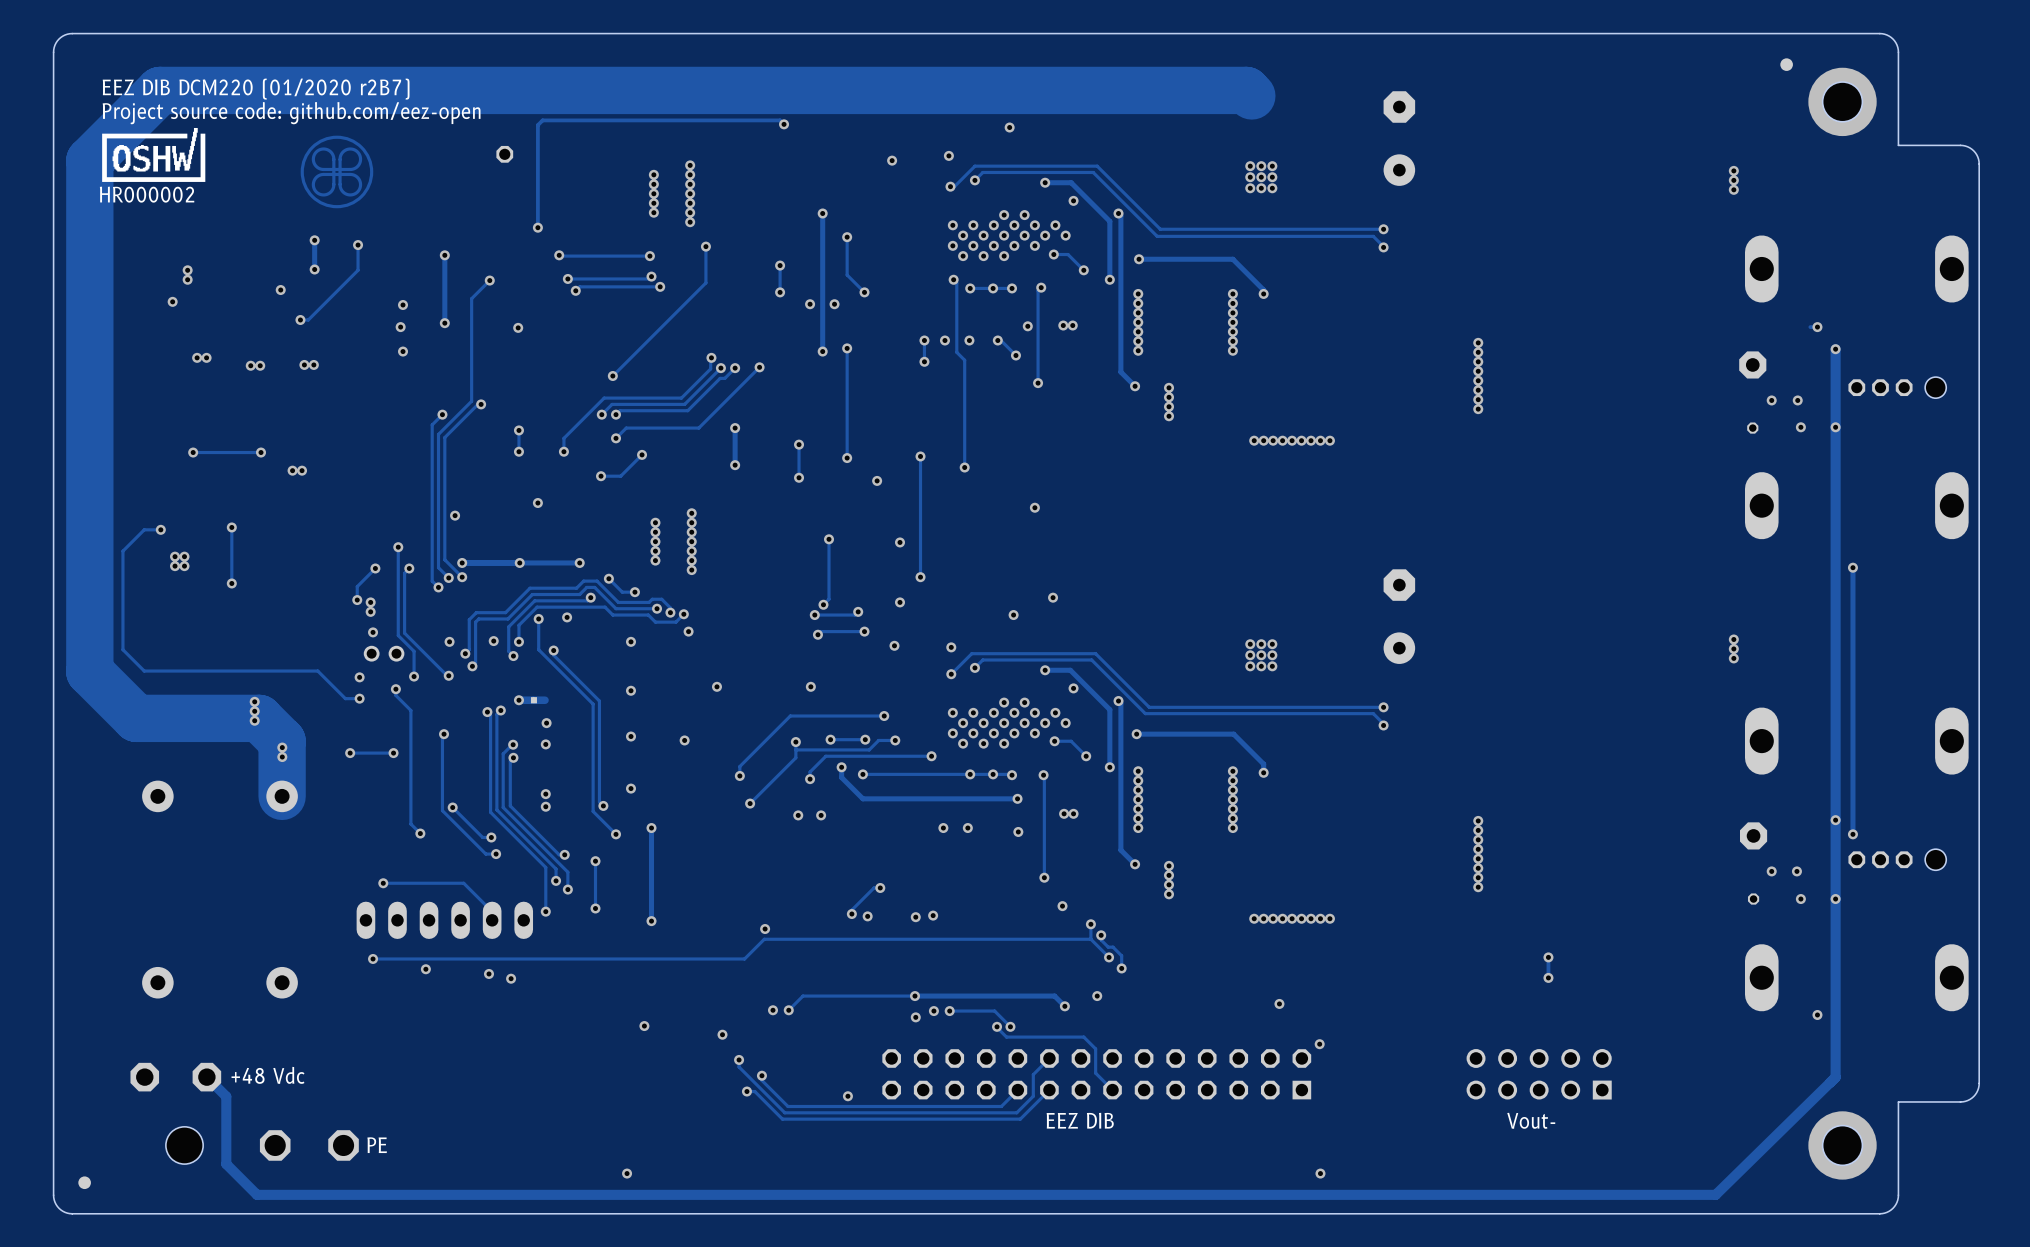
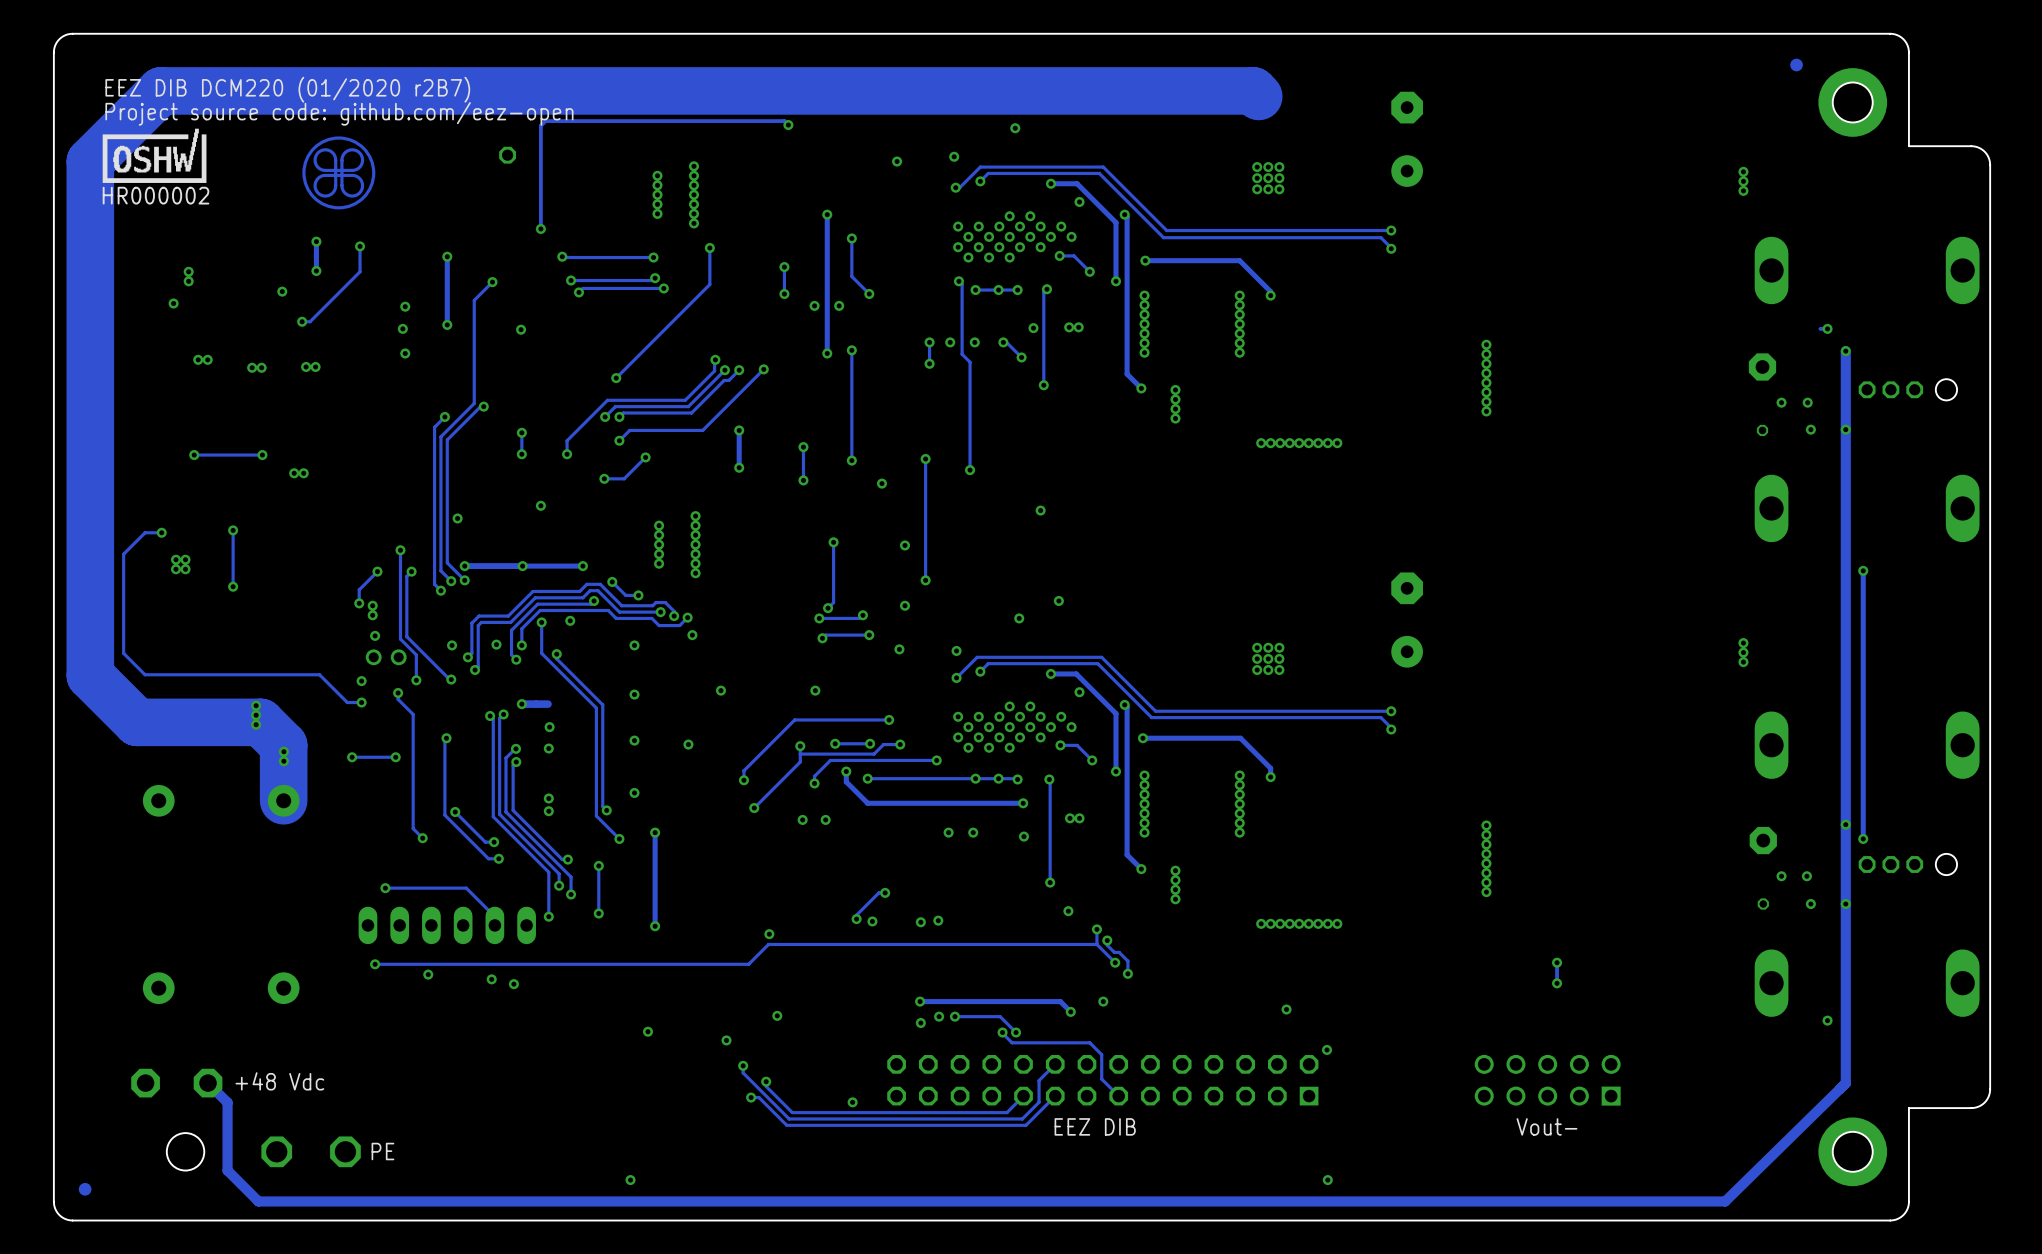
track: (914, 996) (802, 996) (788, 1010) -> none
via: (788, 1010) -> none

